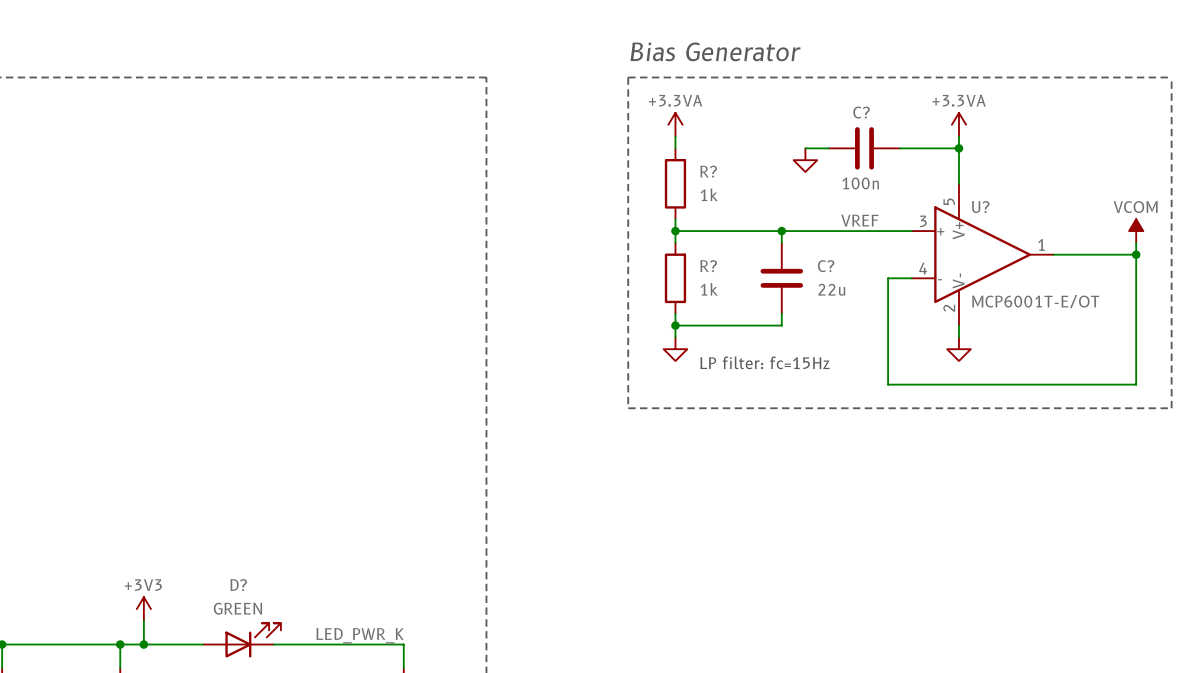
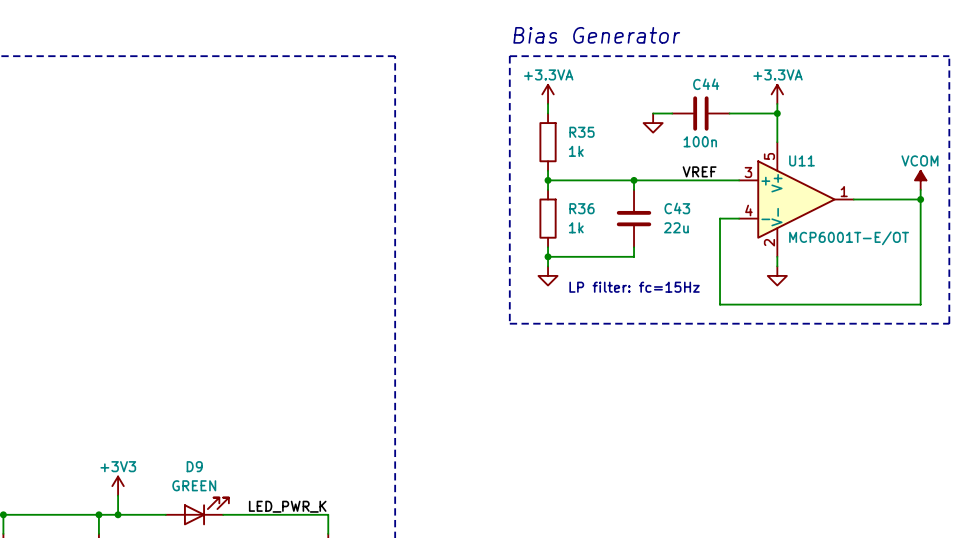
C? name: C? (861, 112) -> C44 (706, 84)
R? name: R? (708, 171) -> R35 (581, 132)
U? name: U? (980, 207) -> U11 (801, 160)
R? name: R? (708, 266) -> R36 (581, 208)
C? name: C? (826, 266) -> C43 (677, 208)
D? name: D? (238, 585) -> D9 (194, 466)

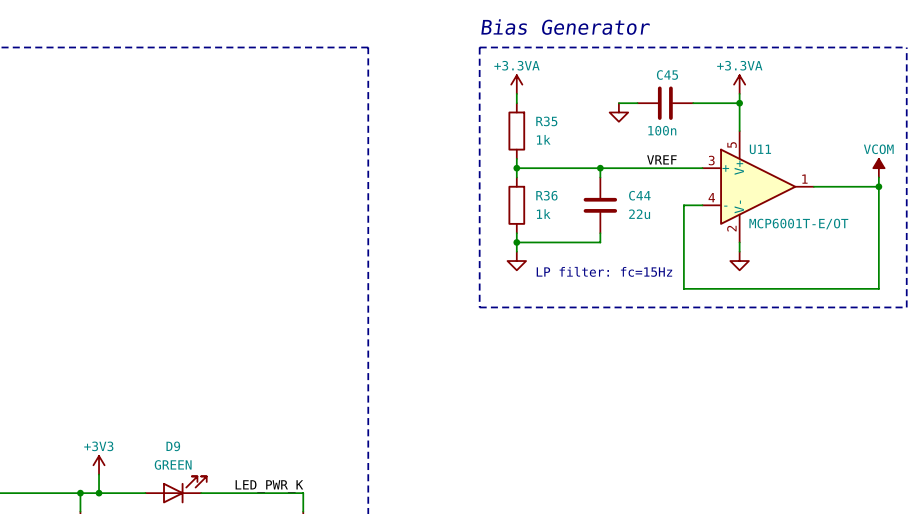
C44 name: C44 (706, 84) -> C45 (667, 75)
C43 name: C43 (677, 208) -> C44 (639, 195)

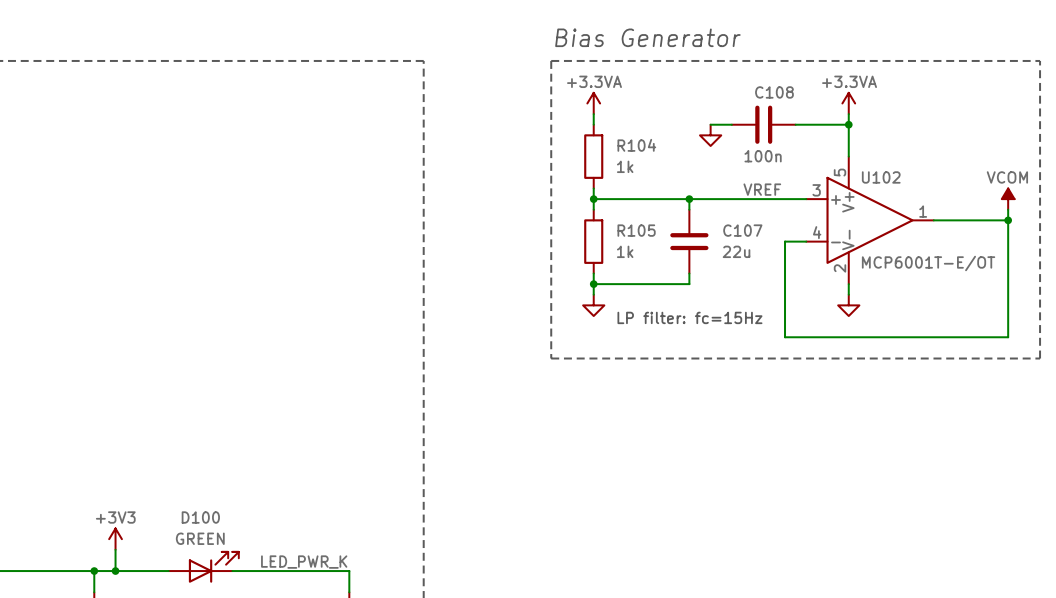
C45 name: C45 (667, 75) -> C108 (774, 92)
R35 name: R35 (546, 121) -> R104 (636, 145)
U11 name: U11 (760, 149) -> U102 (881, 177)
R36 name: R36 (546, 195) -> R105 (636, 230)
C44 name: C44 (639, 195) -> C107 (742, 230)
D9 name: D9 (173, 446) -> D100 (200, 517)

